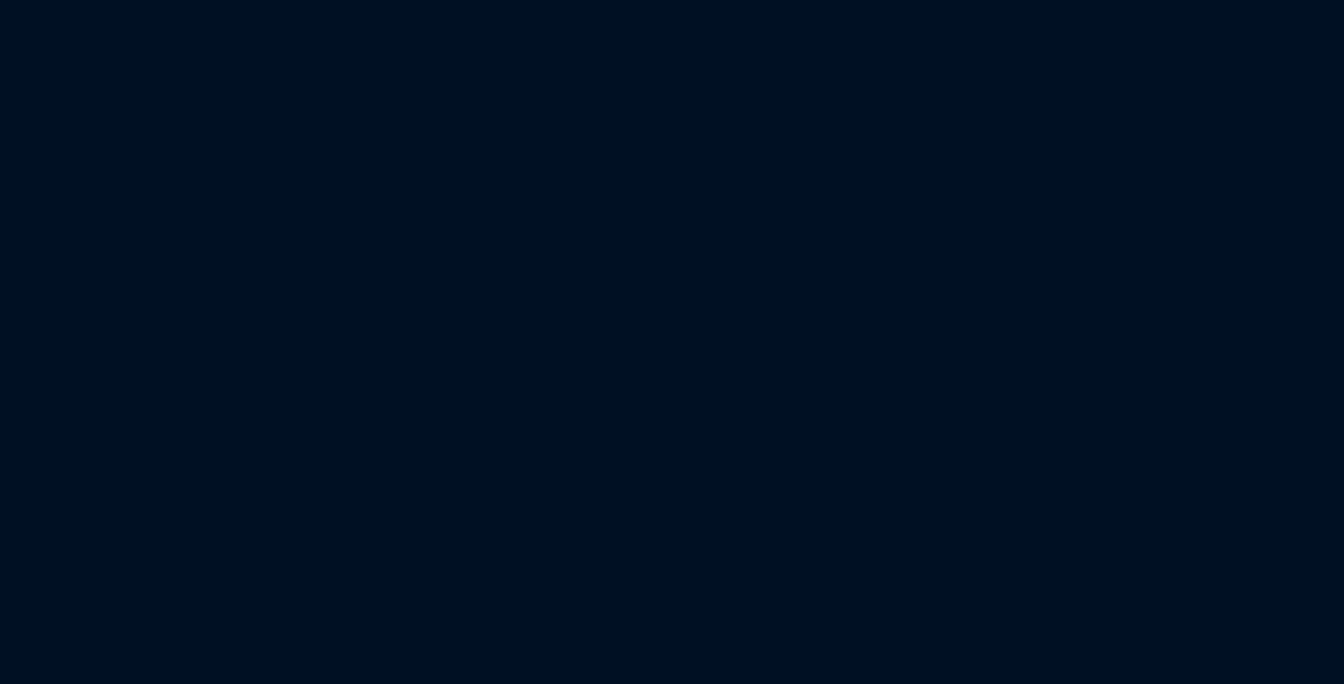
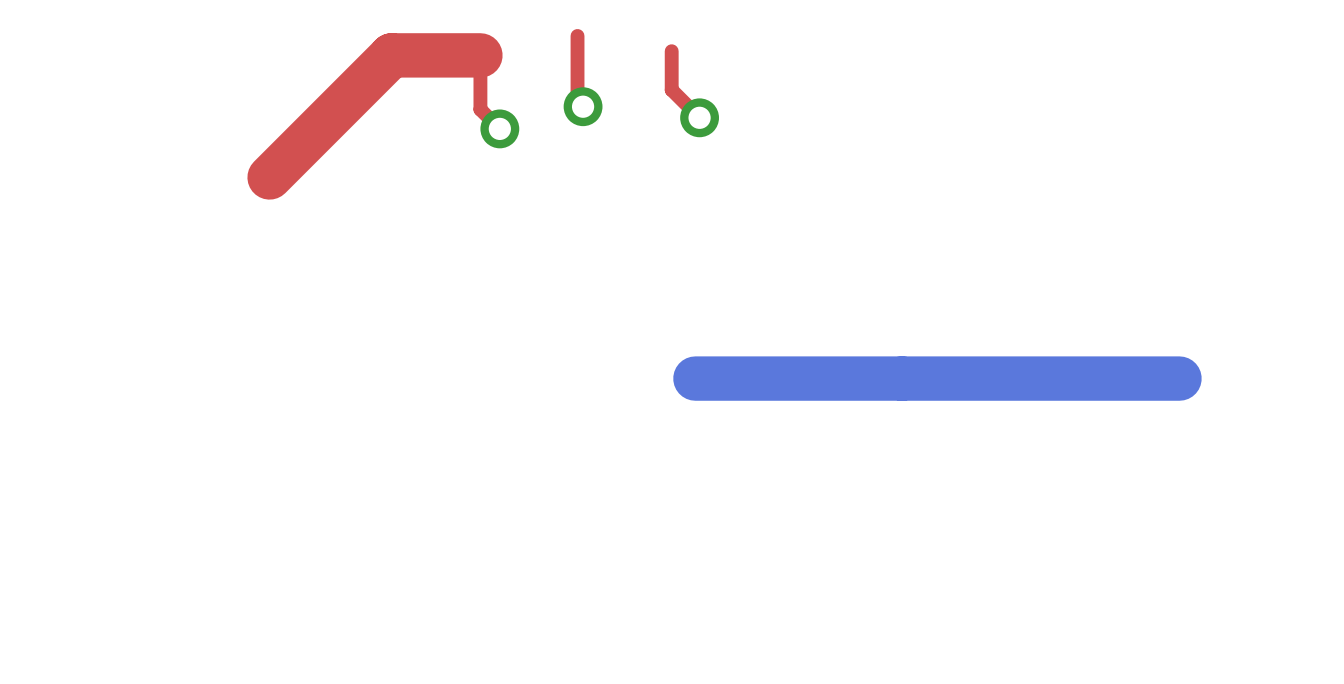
top track: none -> (577, 35) (577, 101)
top track: none -> (671, 51) (671, 89) (699, 117)
via: none -> (583, 106)
via: none -> (699, 117)
top track: none -> (499, 128) (480, 109) (480, 55) (391, 55) (269, 177)
via: none -> (499, 128)
bottom track: none -> (695, 378) (1179, 378)

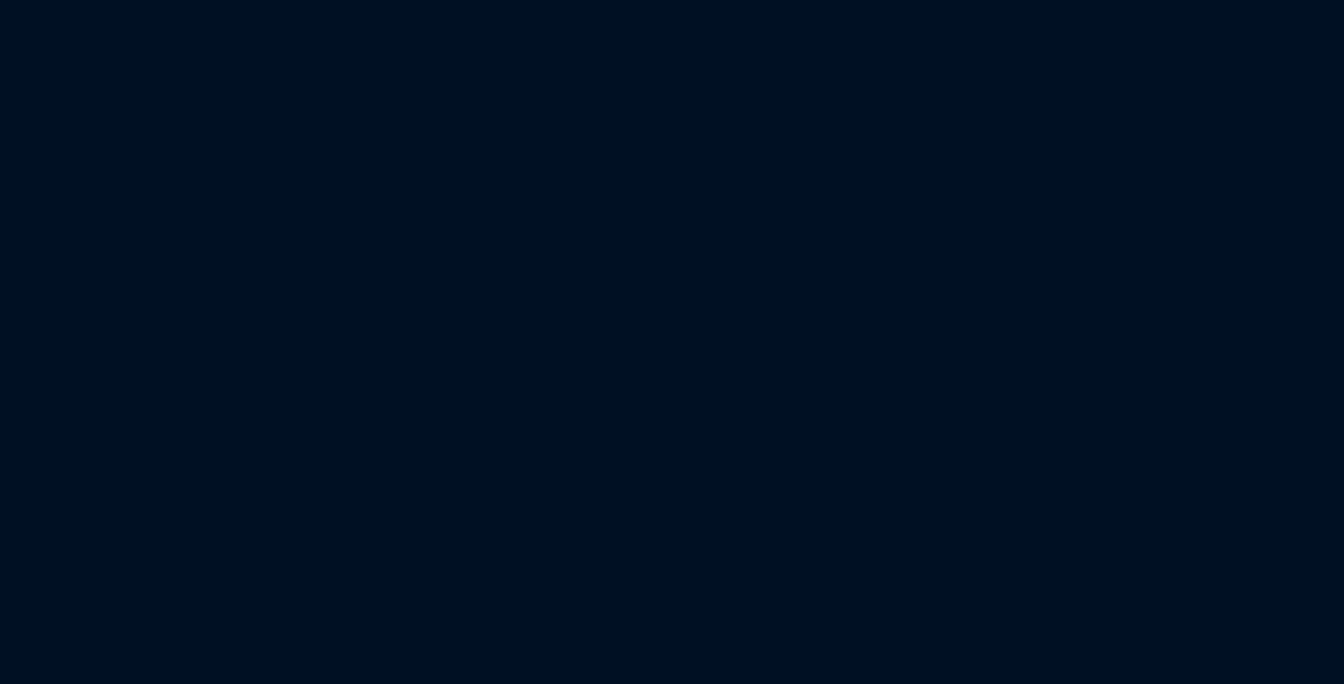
top track: (577, 35) (577, 101) -> none
top track: (671, 51) (671, 89) (699, 117) -> none
via: (583, 106) -> none
via: (699, 117) -> none
top track: (499, 128) (480, 109) (480, 55) (391, 55) (269, 177) -> none
via: (499, 128) -> none
bottom track: (695, 378) (1179, 378) -> none

